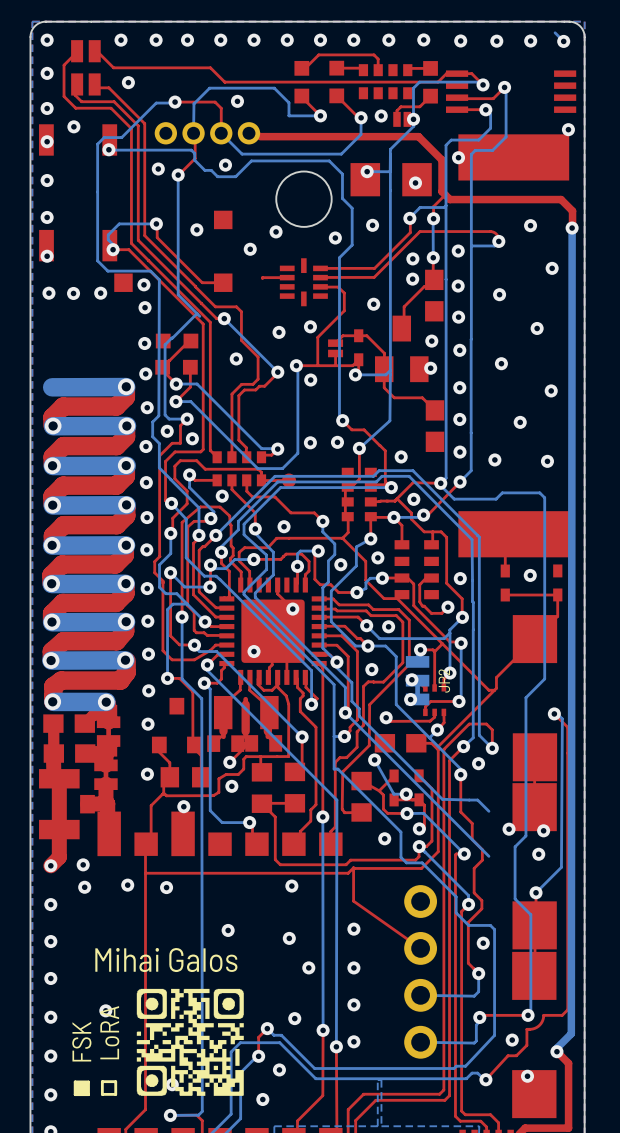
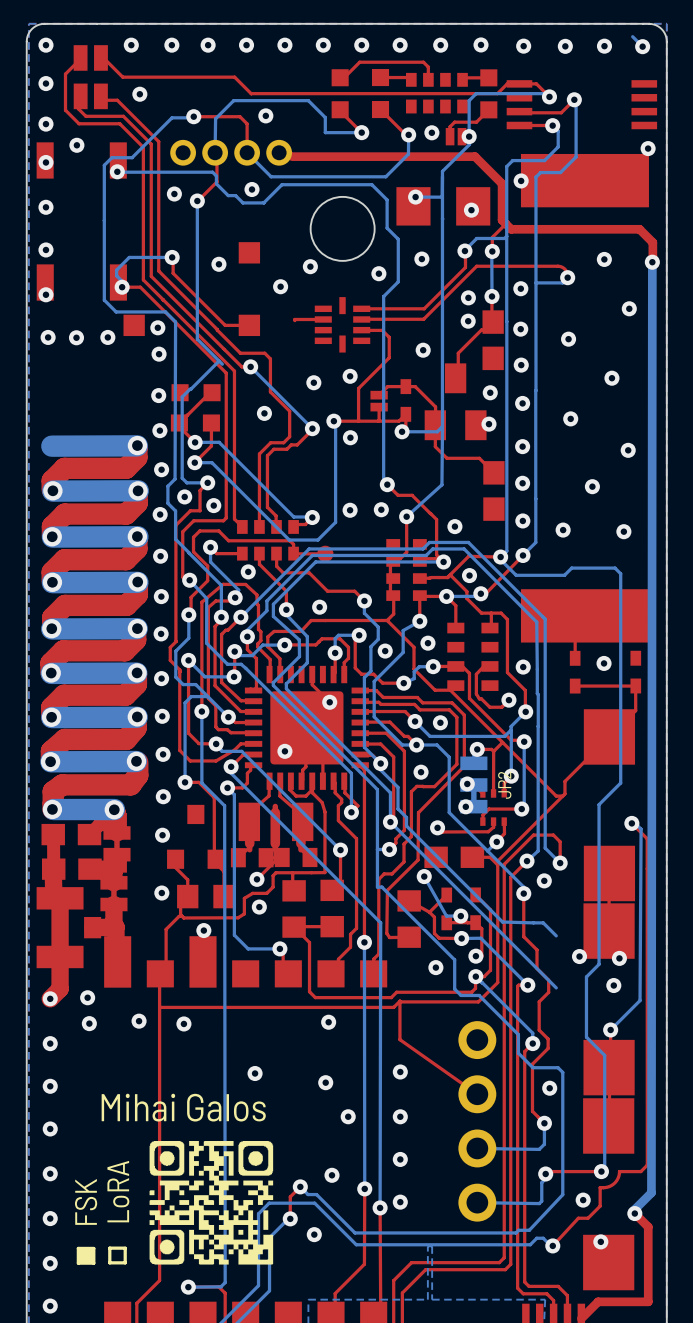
via: (105, 1010) -> none
via: (172, 1084) -> none
via: (262, 1099) -> none

